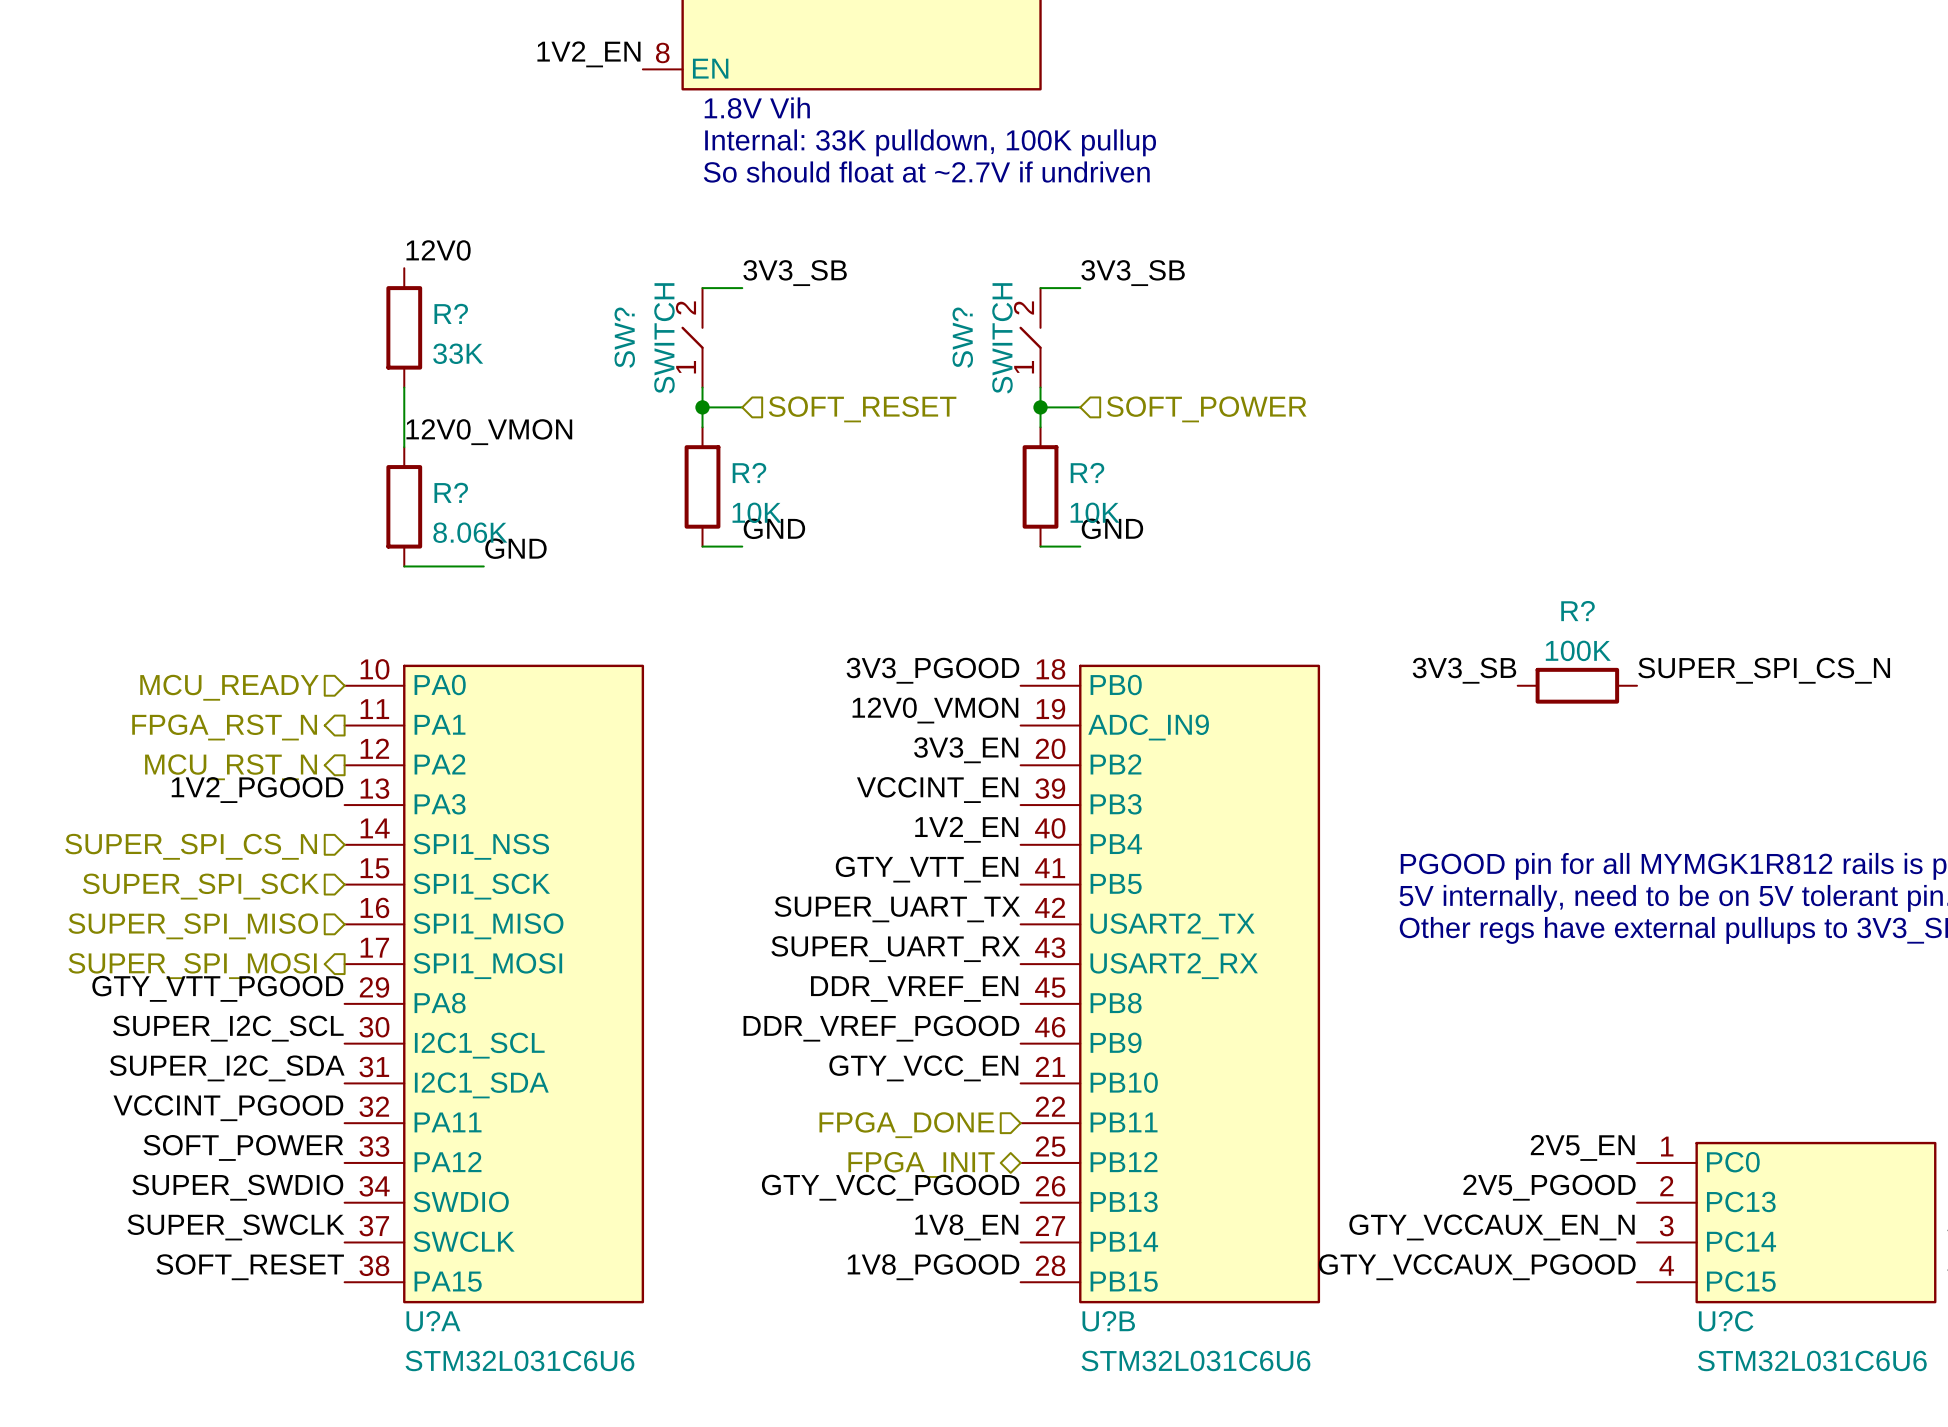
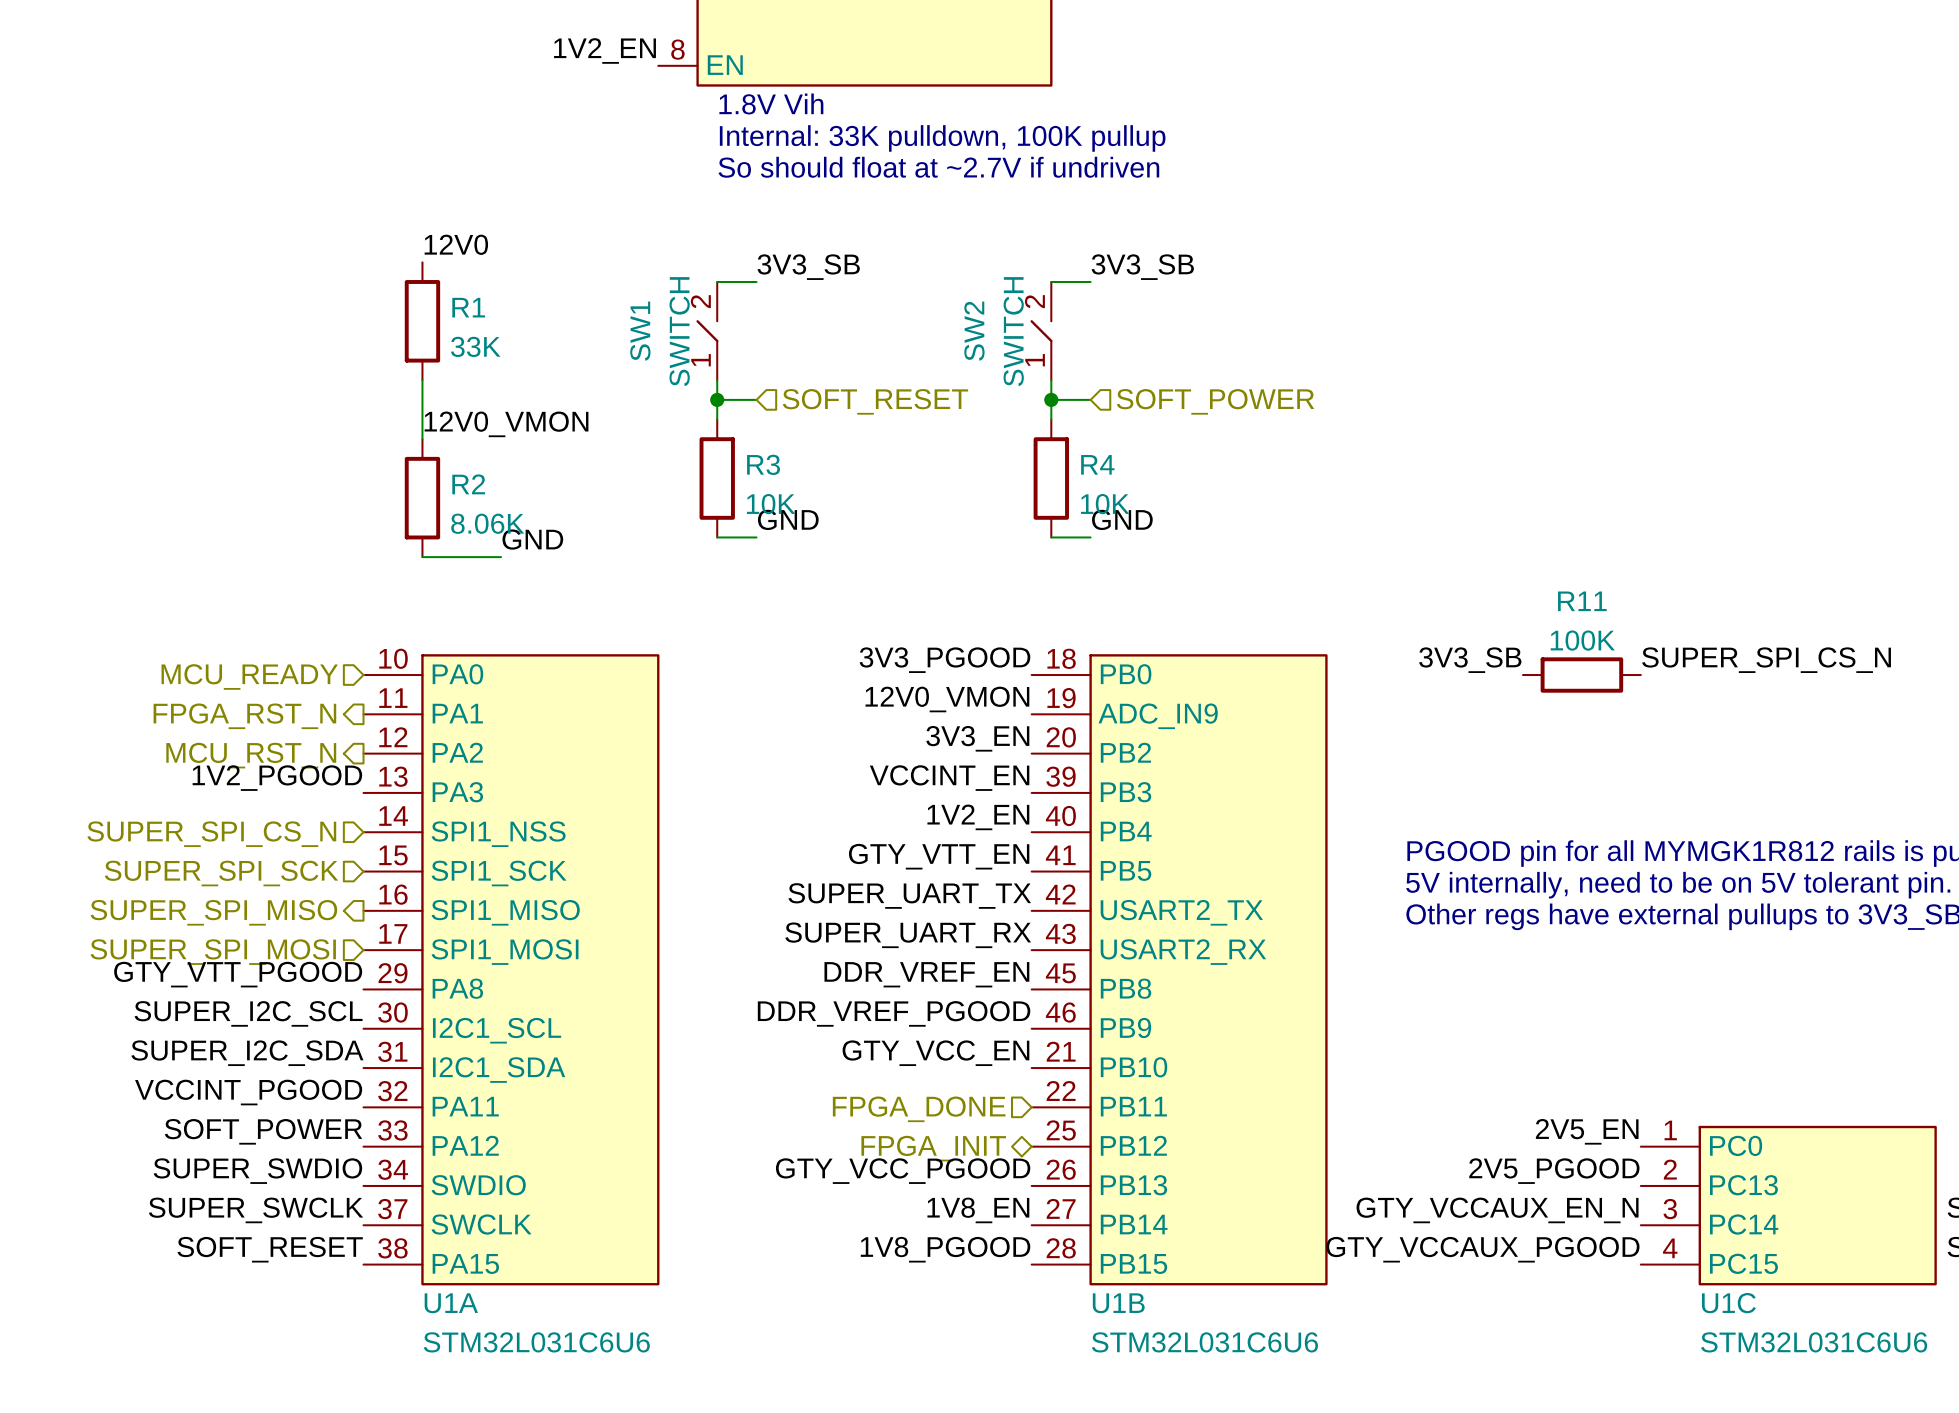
R? name: R? (451, 313) -> R1 (468, 307)
SW? name: SW? (624, 337) -> SW1 (640, 331)
SW? name: SW? (962, 337) -> SW2 (974, 331)
R? name: R? (749, 472) -> R3 (763, 464)
R? name: R? (1087, 472) -> R4 (1097, 464)
R? name: R? (451, 492) -> R2 (468, 484)
R? name: R? (1578, 611) -> R11 (1582, 601)
hierarchical label shape: input (193, 926) -> output (213, 912)
hierarchical label shape: output (192, 966) -> input (213, 952)
U?A name: U?A (433, 1321) -> U1A (451, 1303)
U?B name: U?B (1108, 1321) -> U1B (1118, 1303)
U?C name: U?C (1726, 1321) -> U1C (1728, 1303)

